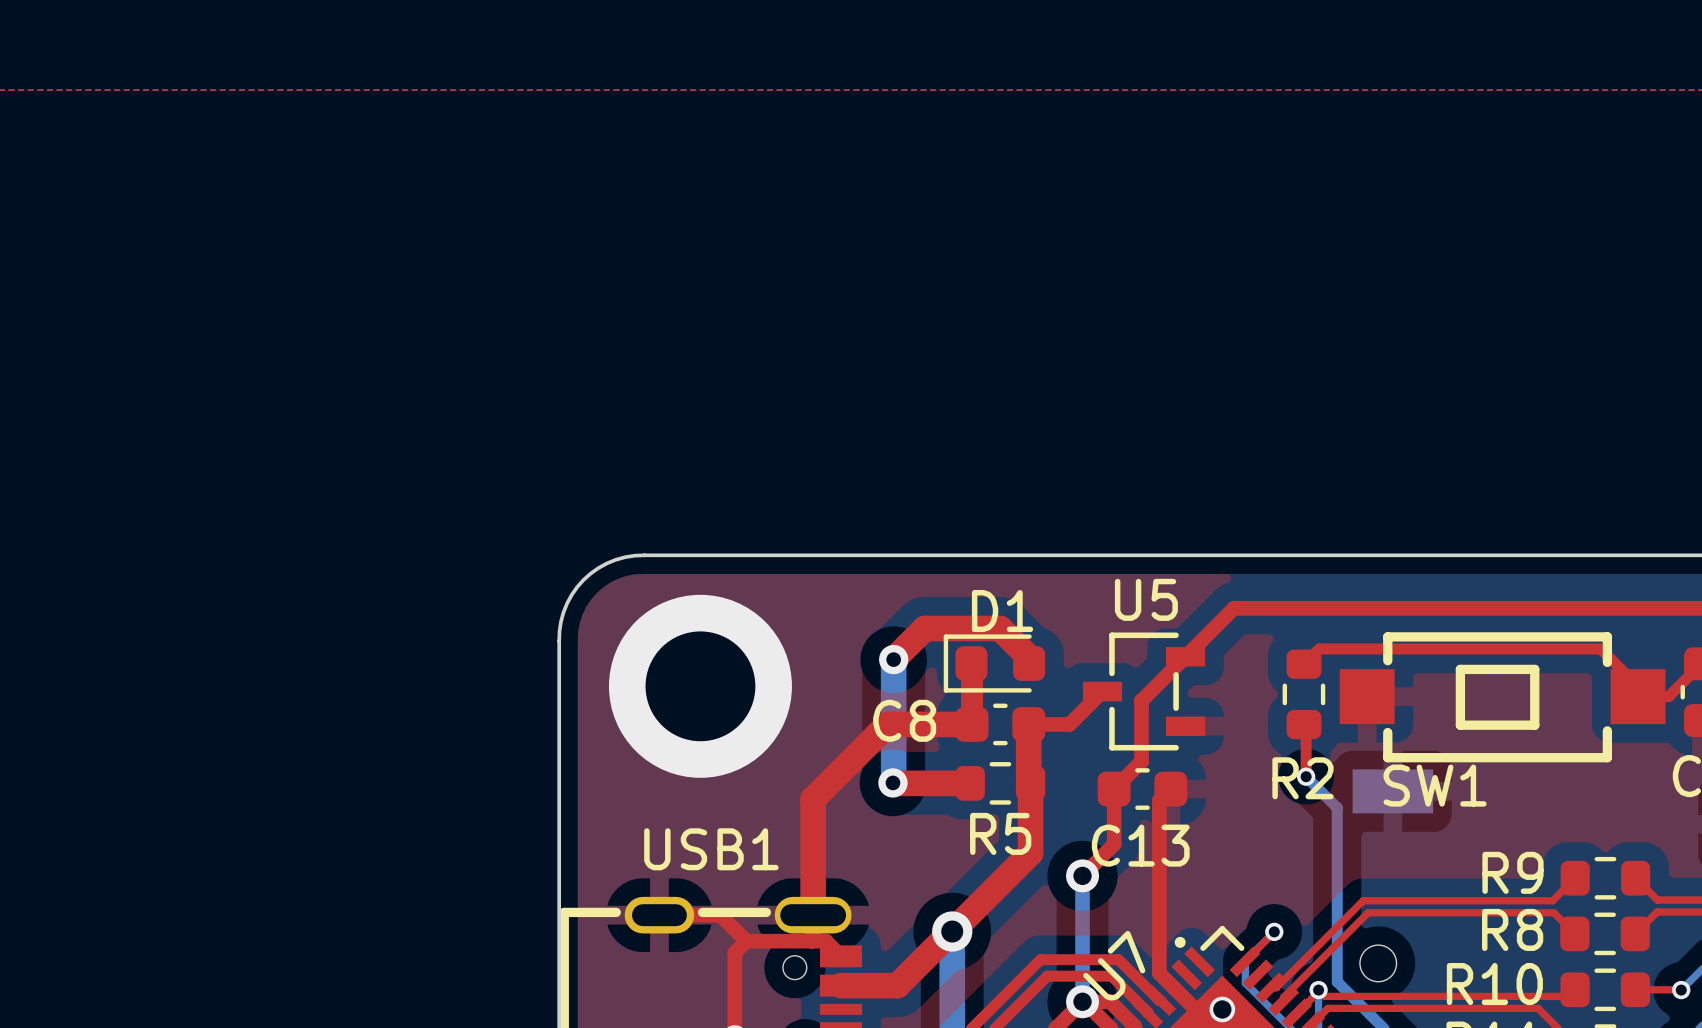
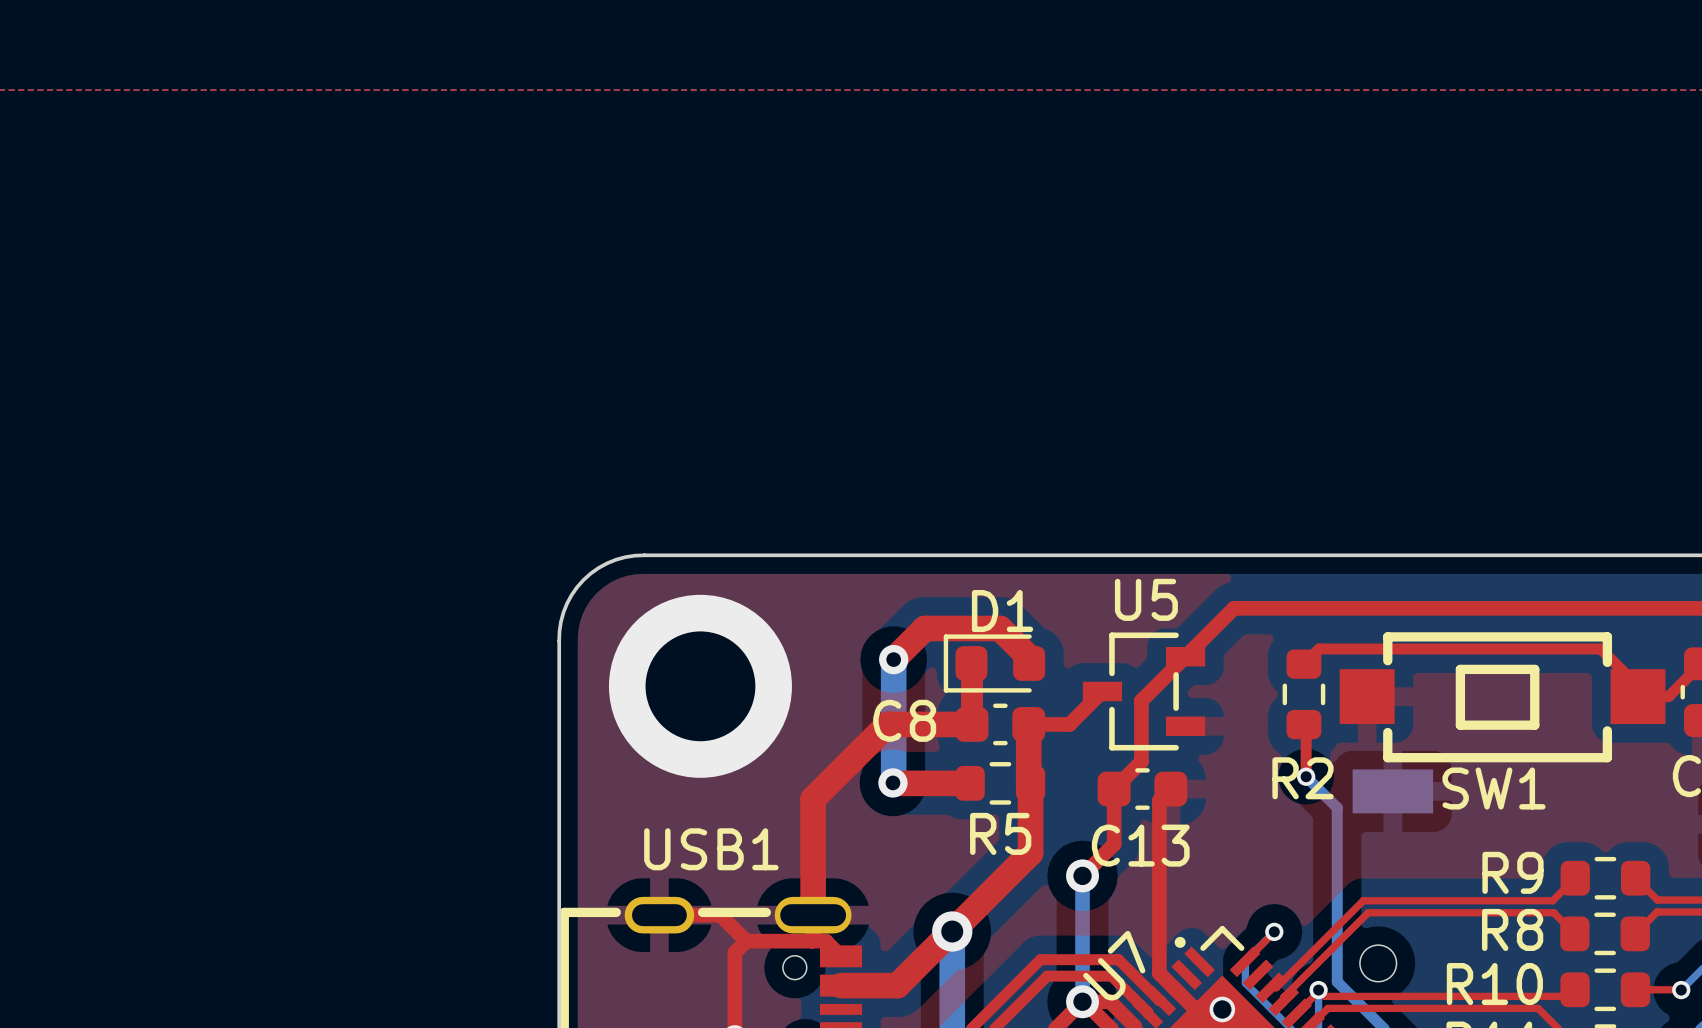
SW1 name position: SW1 (1435, 785) -> SW1 (1493, 788)

